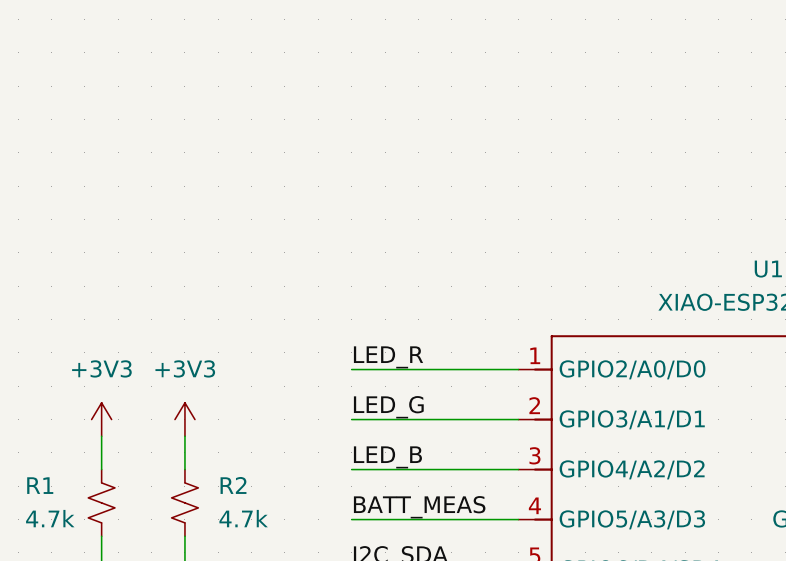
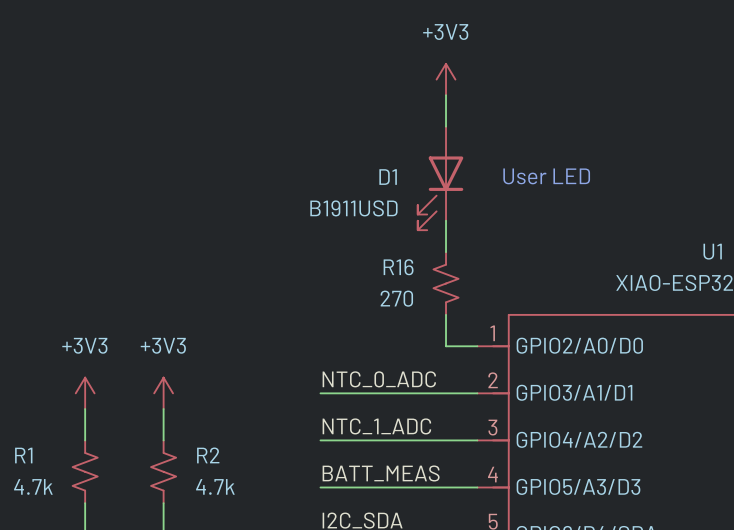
power symbol: none -> +3V3 (446, 79)
wire: none -> (446, 95) (446, 126)
text: none -> User LED (546, 176)
D1: none -> B1911USD (440, 178)
wire: none -> (446, 220) (446, 252)
R16: none -> 270 (446, 283)
label: LED_R (388, 357) -> none
wire: (351, 369) (485, 369) -> (446, 314) (446, 346)
label: LED_G (388, 407) -> NTC_0_ADC (379, 379)
label: LED_B (387, 457) -> NTC_1_ADC (376, 426)

